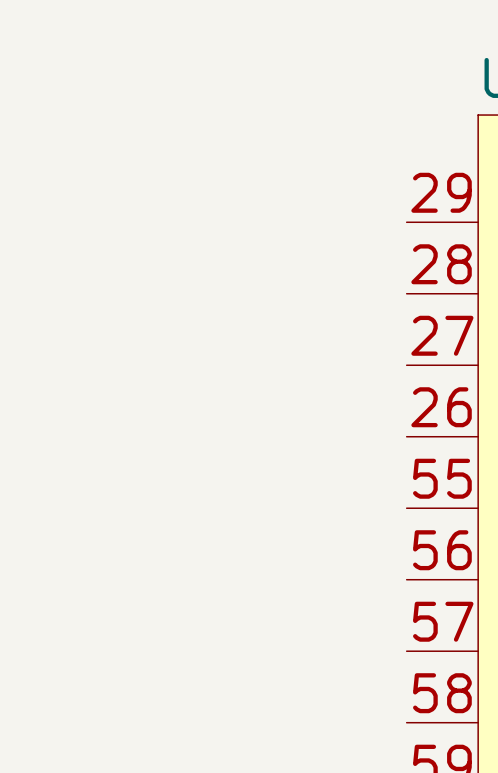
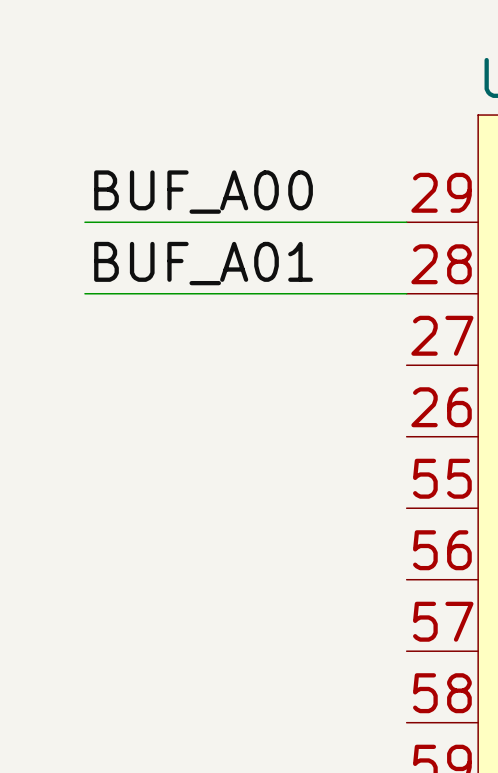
label: none -> BUF_A00 (203, 192)
wire: none -> (84, 222) (406, 222)
label: none -> BUF_A01 (203, 263)
wire: none -> (84, 293) (406, 293)

